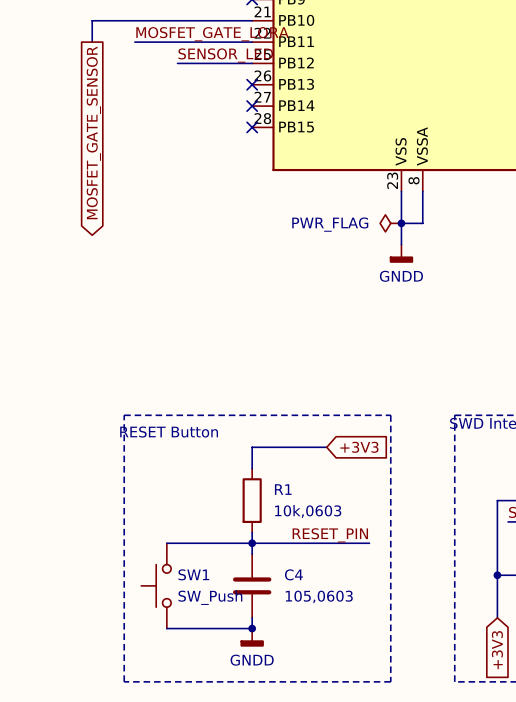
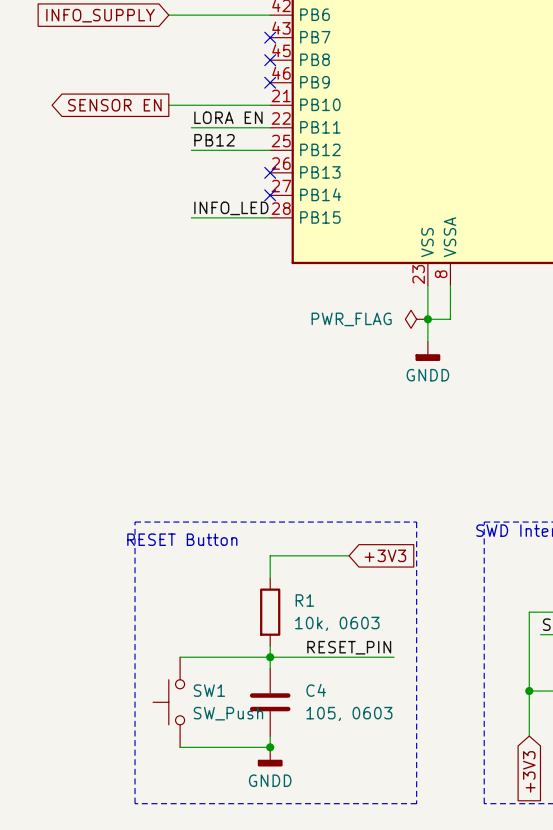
global label: none -> SENSOR EN (114, 105)
wire: (156, 20) (92, 20) (92, 42) -> none
label: none -> LORA EN (228, 117)
label: MOSFET_GATE_LORA (212, 34) -> none
wire: (134, 42) (177, 42) -> none
label: SENSOR_LED (225, 55) -> PB12 (214, 140)
label: none -> INFO_LED (231, 208)
wire: none -> (191, 217) (270, 217)
no-connect mark: (252, 127) -> none
global label: MOSFET_GATE_SENSOR (93, 132) -> none
R1 value: 10k,0603 (308, 511) -> 10k, 0603 (337, 623)
C4 value: 105,0603 (319, 596) -> 105, 0603 (349, 713)

